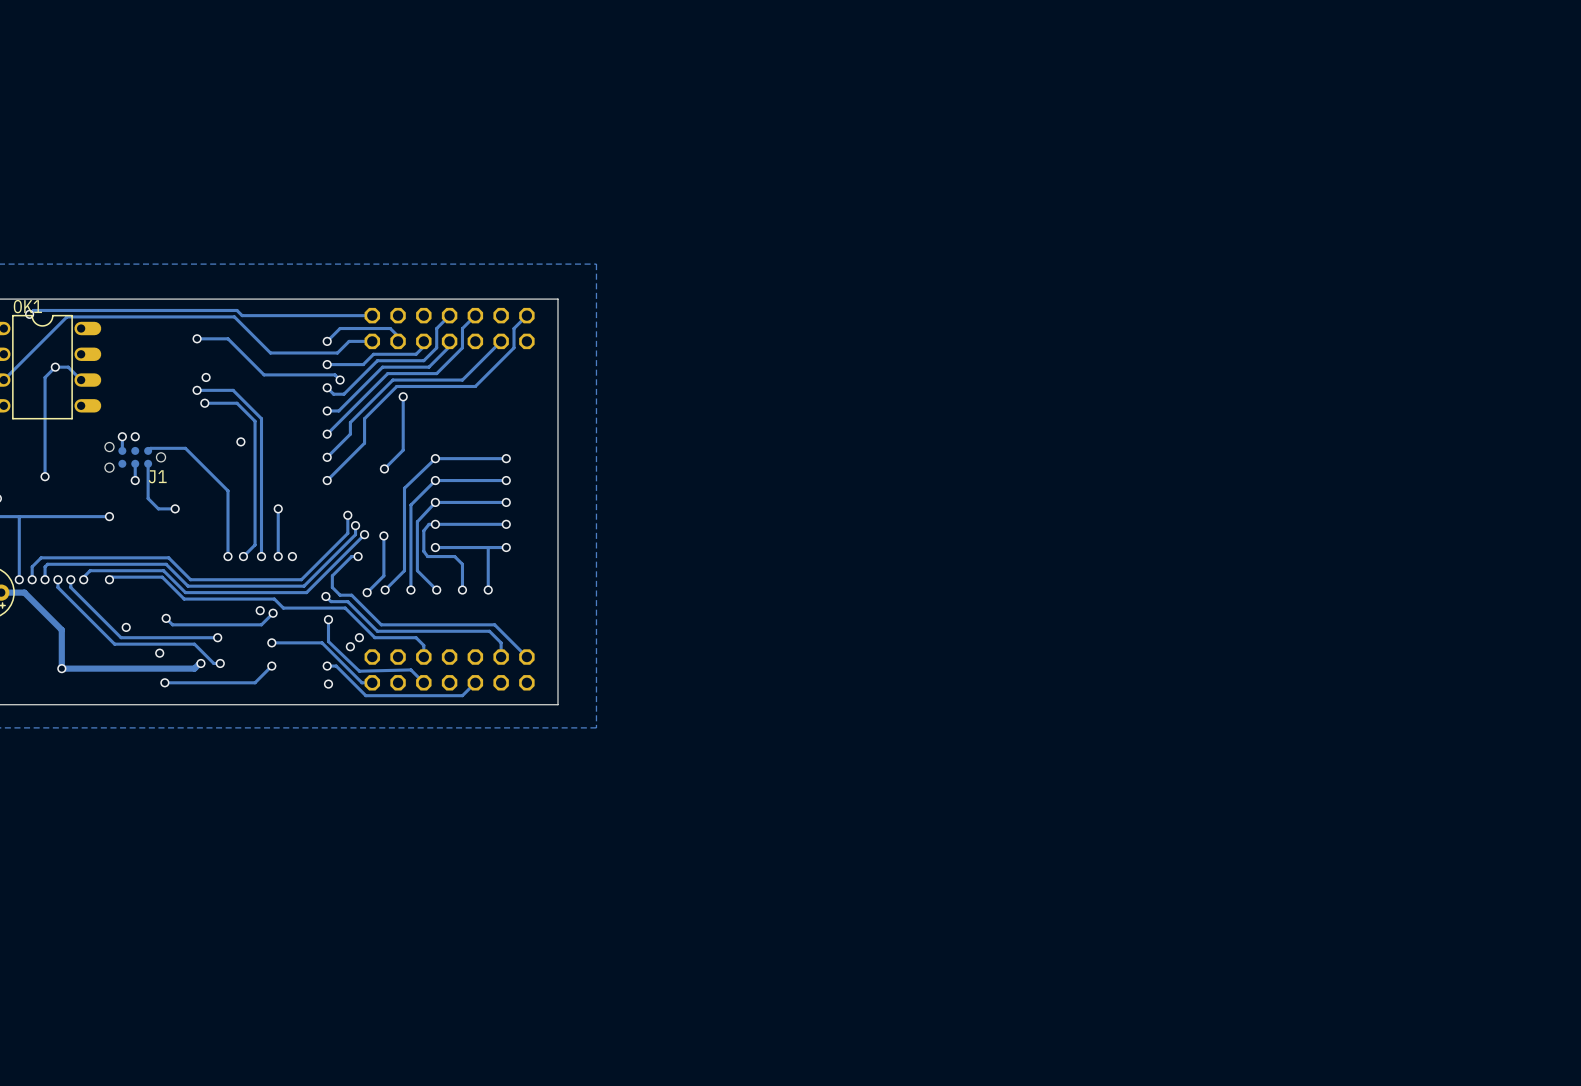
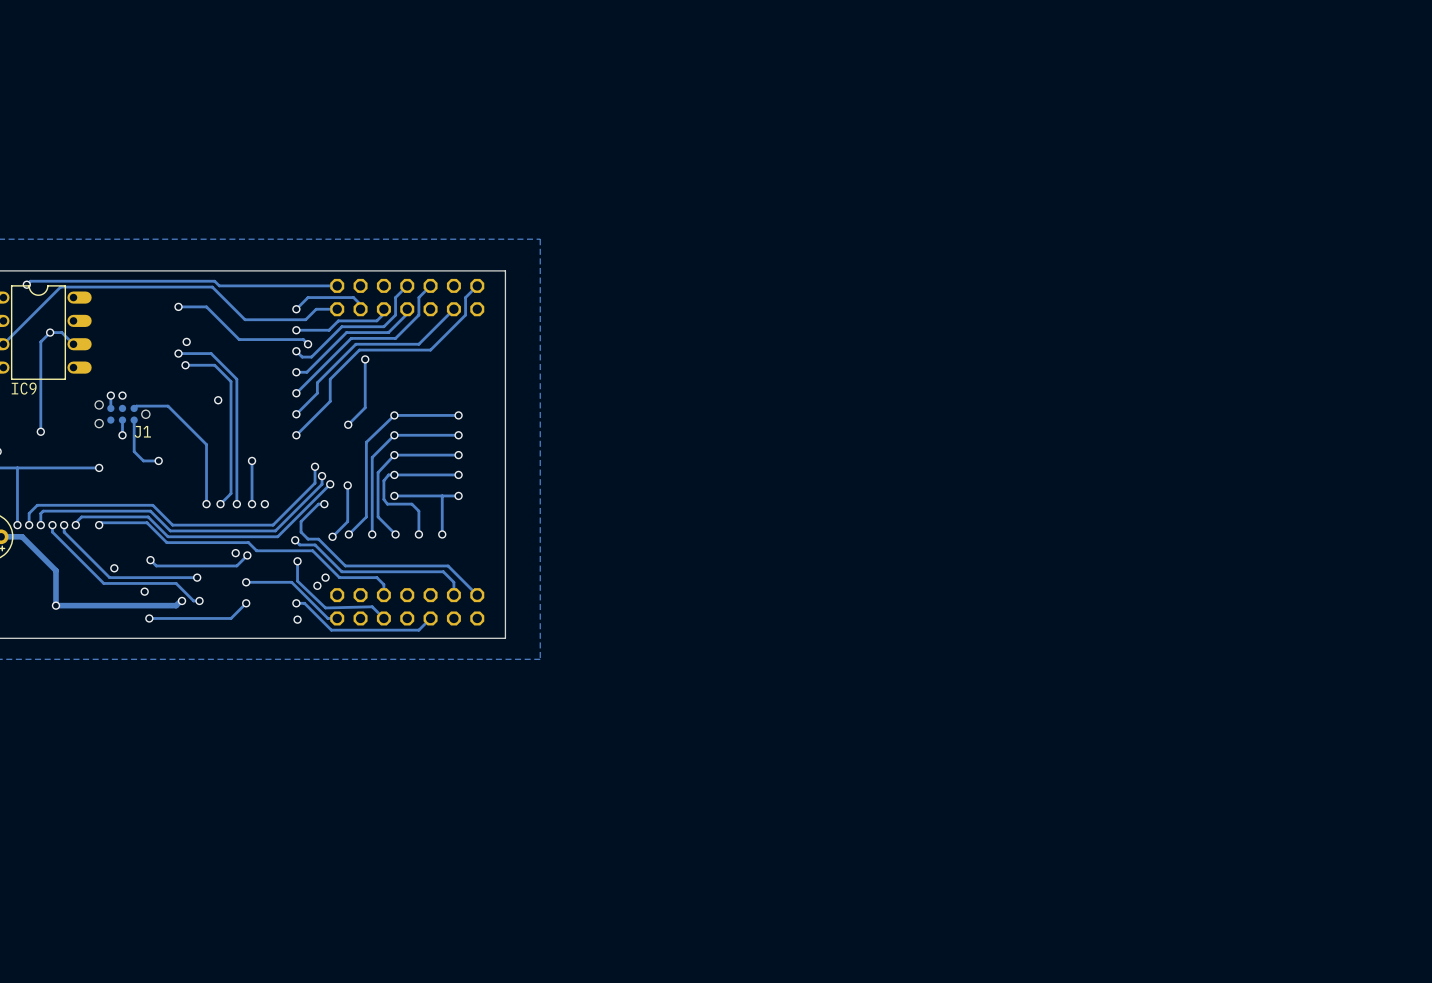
OK1 name: OK1 (27, 306) -> IC9 (24, 388)

